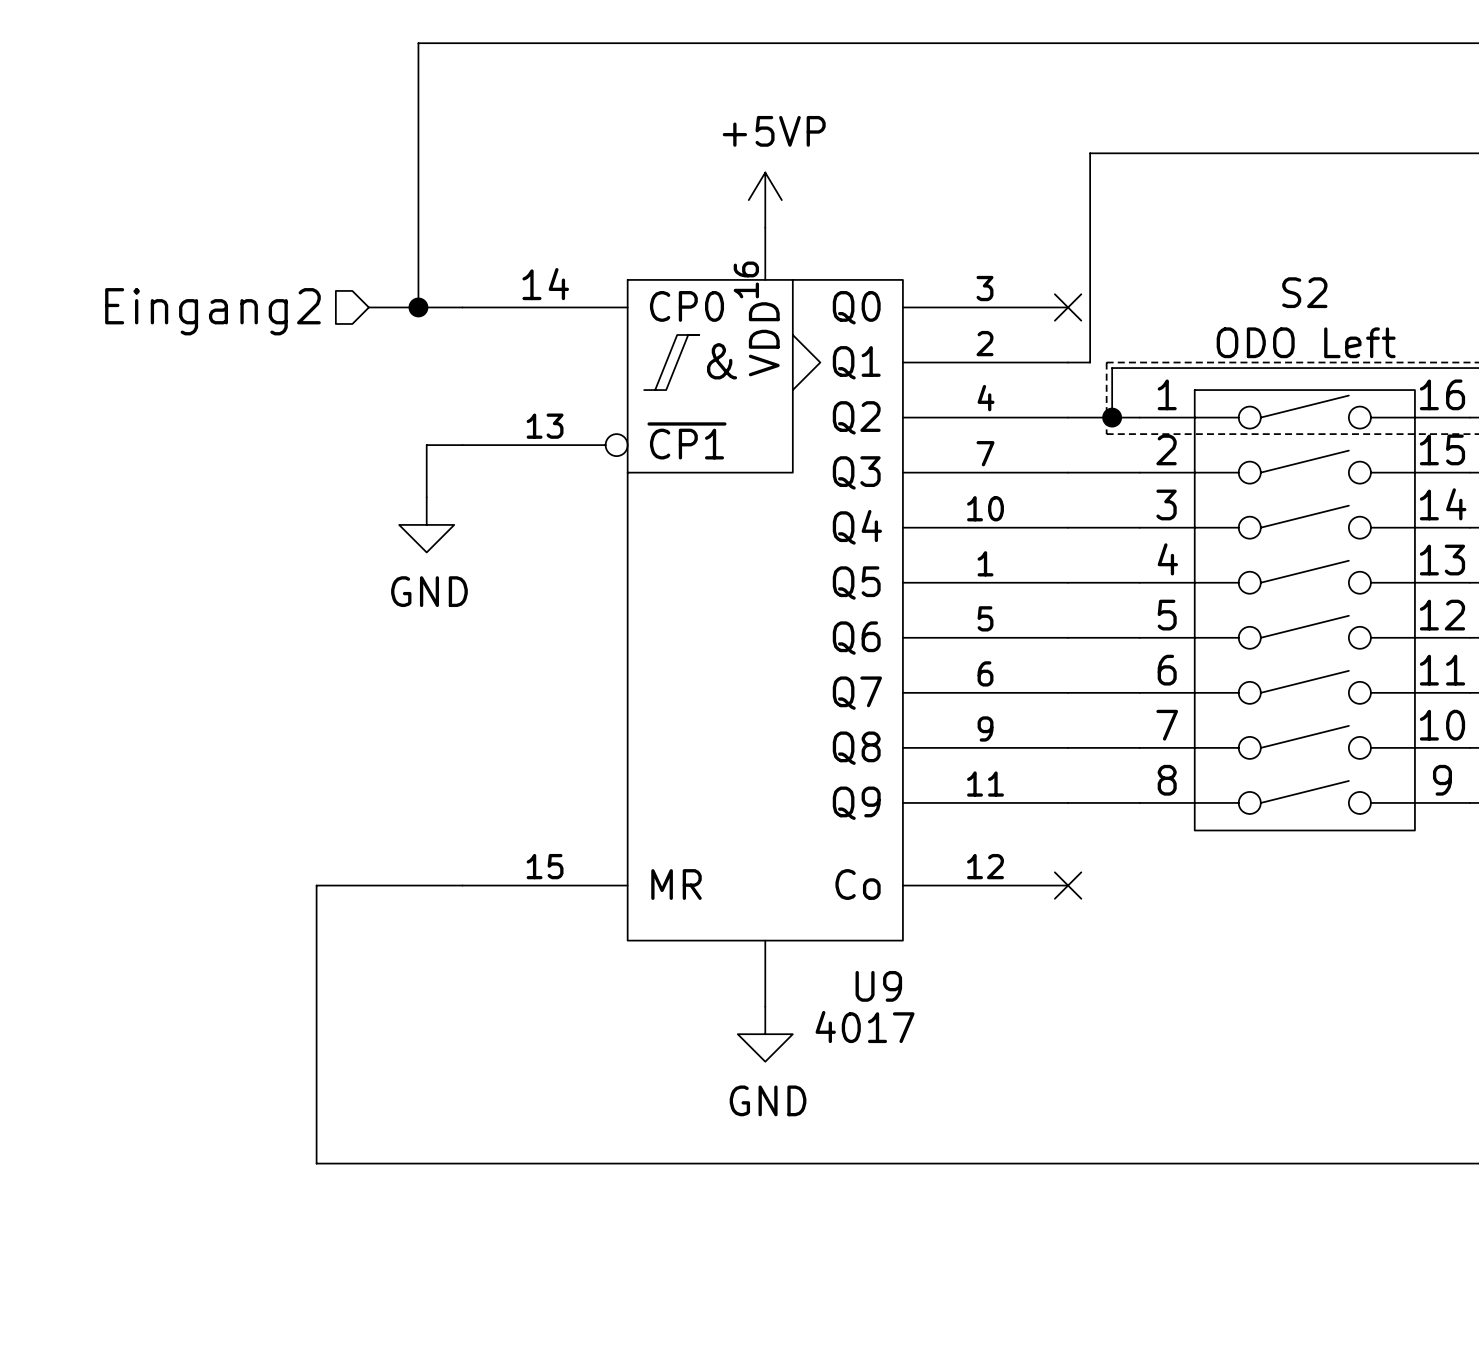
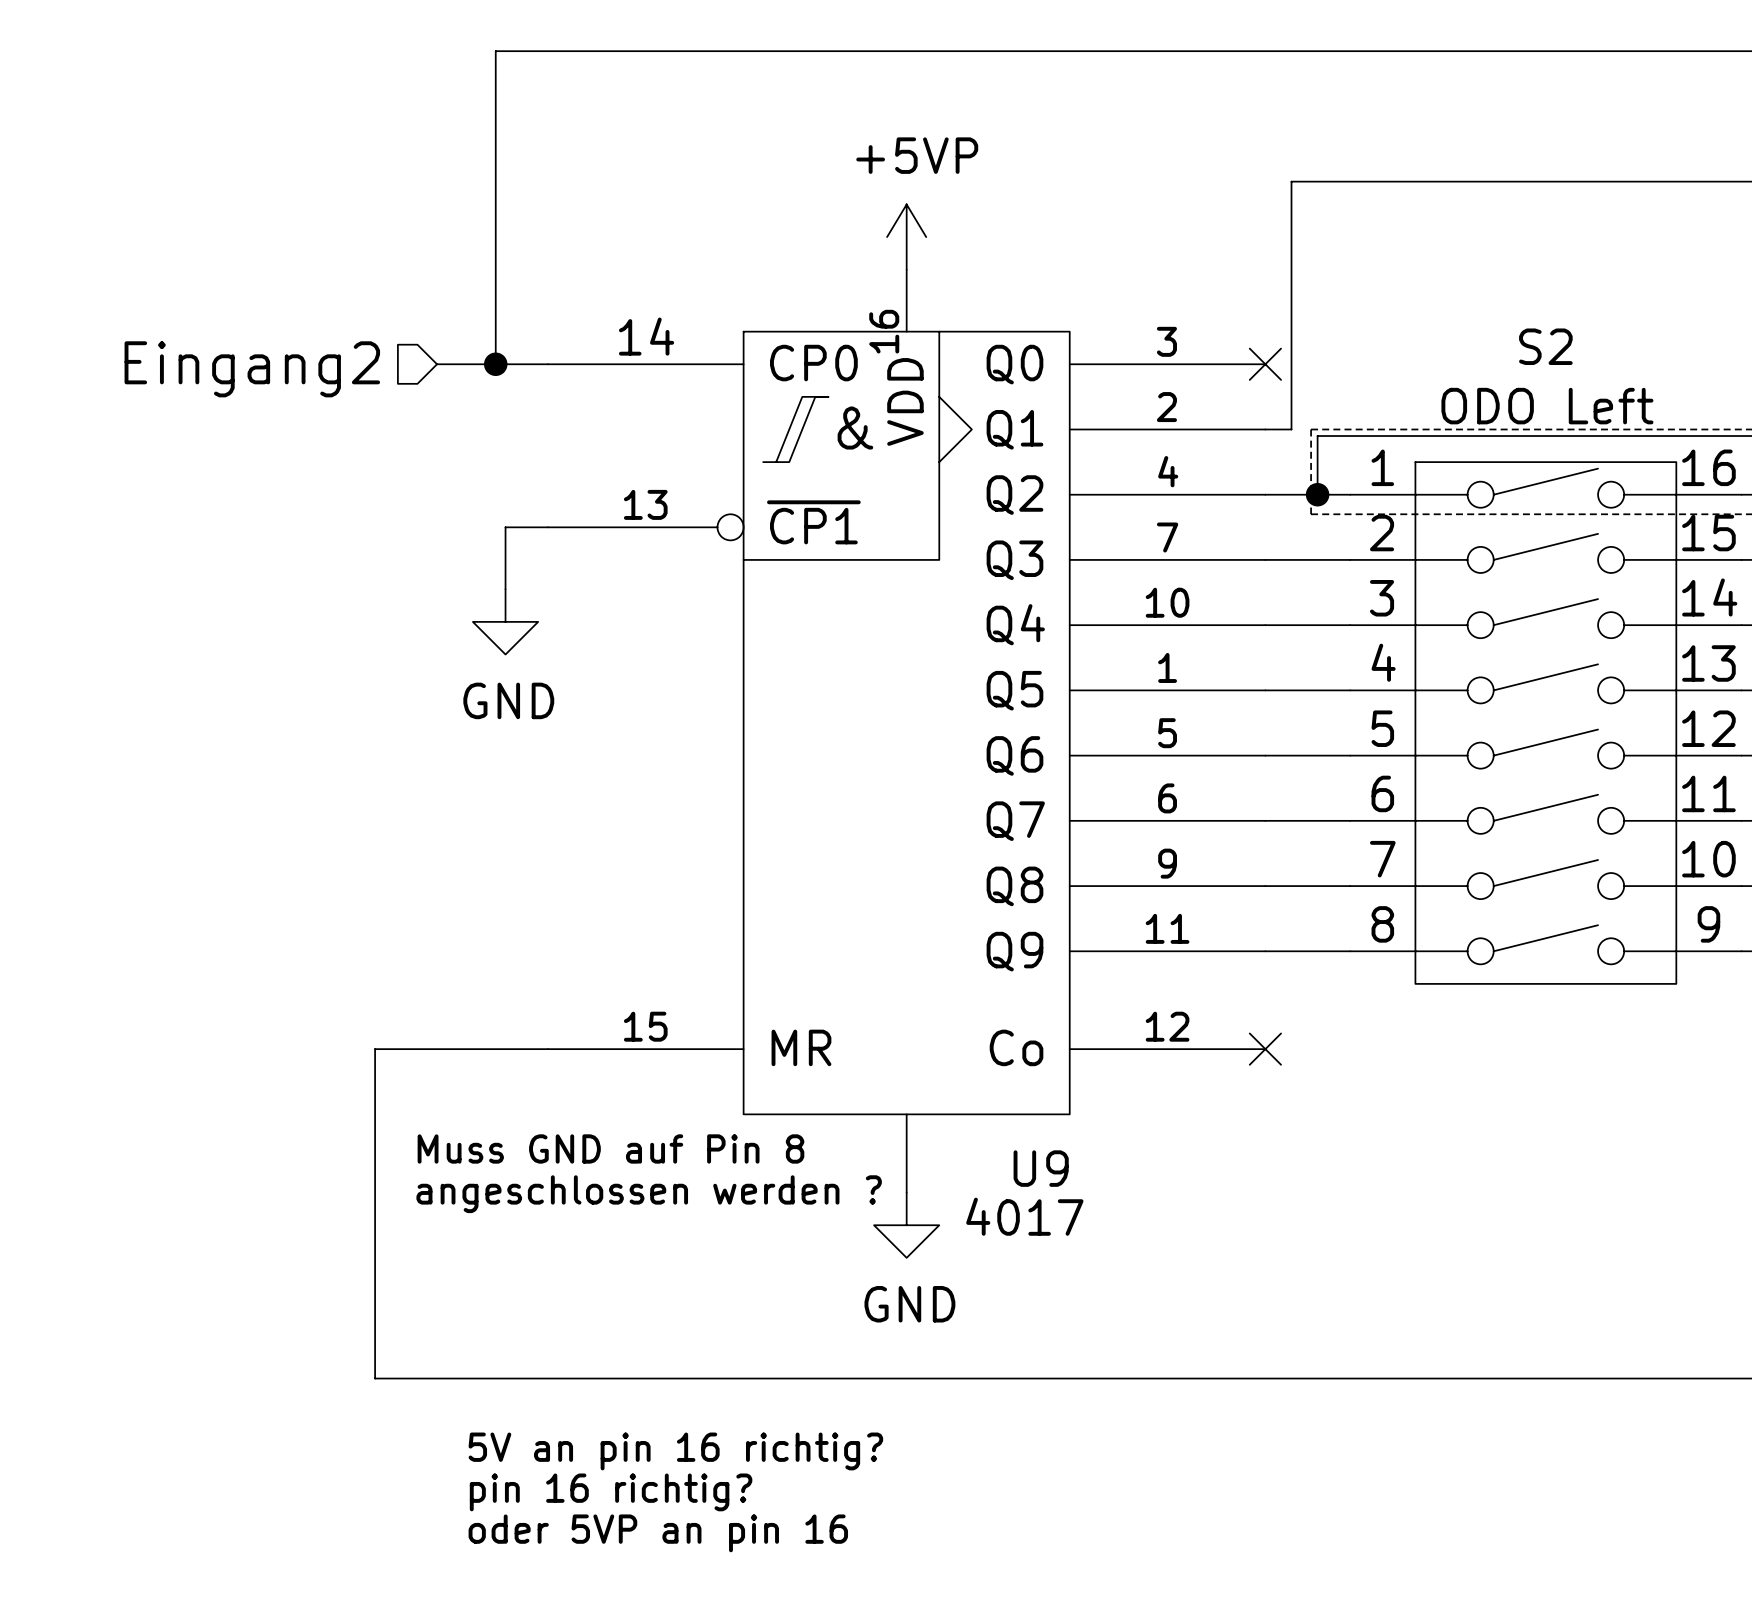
text: none -> Muss GND auf Pin 8 (610, 1148)
text: none -> angeschlossen werden ? (649, 1194)
text: none -> 5V an pin 16 richtig? (675, 1451)
text: none -> pin 16 richtig? (611, 1492)
text: none -> oder 5VP an pin 16 (658, 1533)

